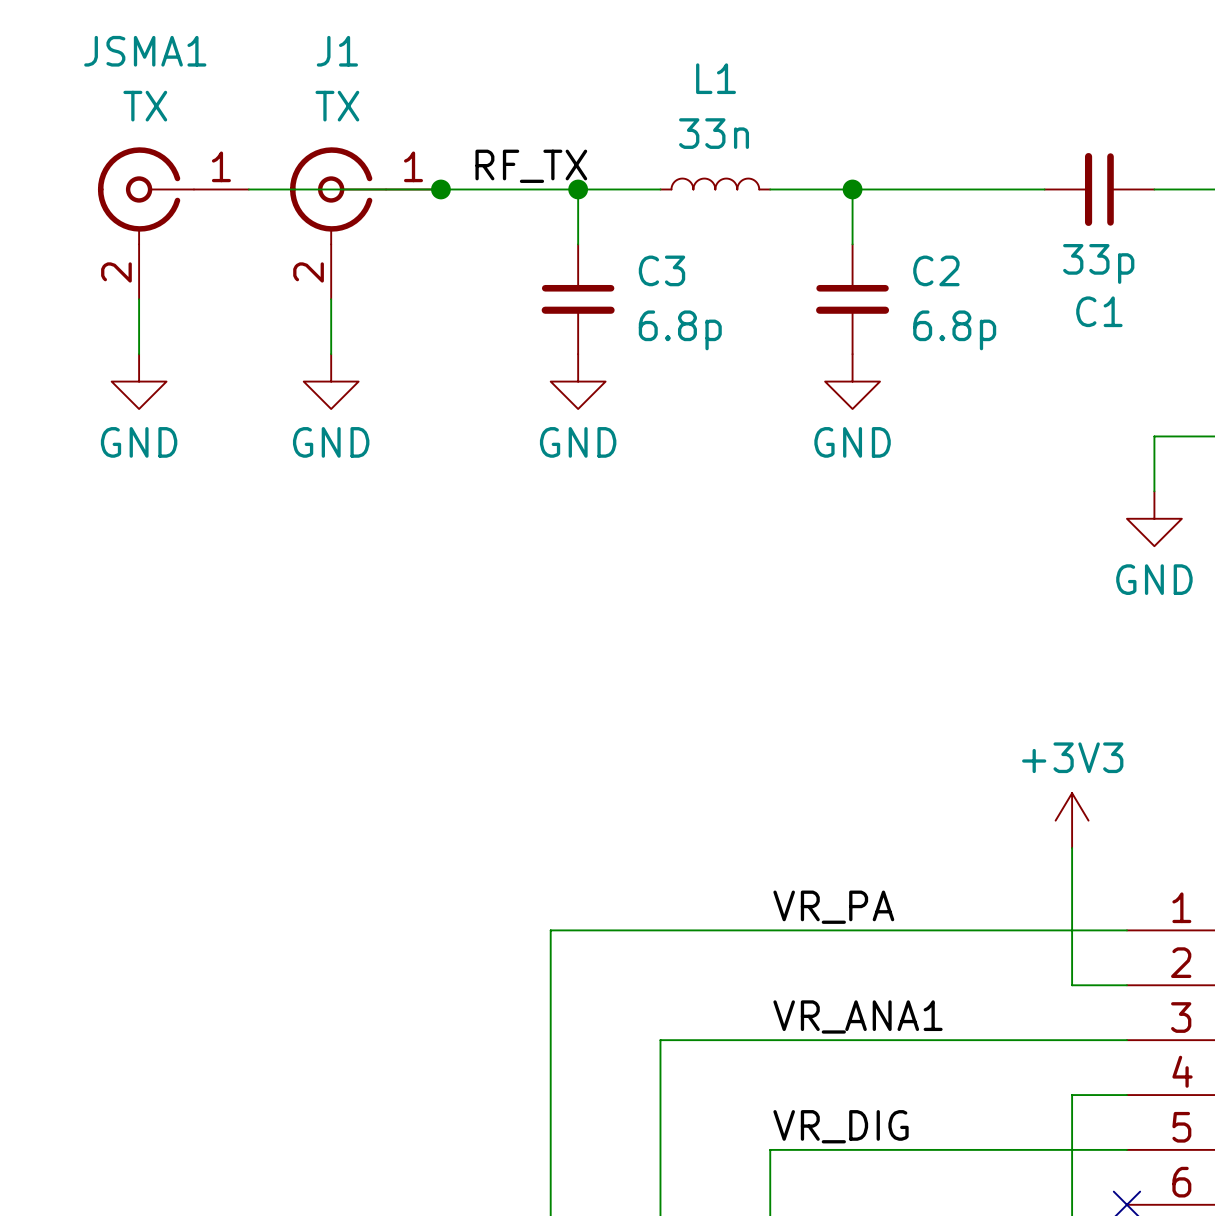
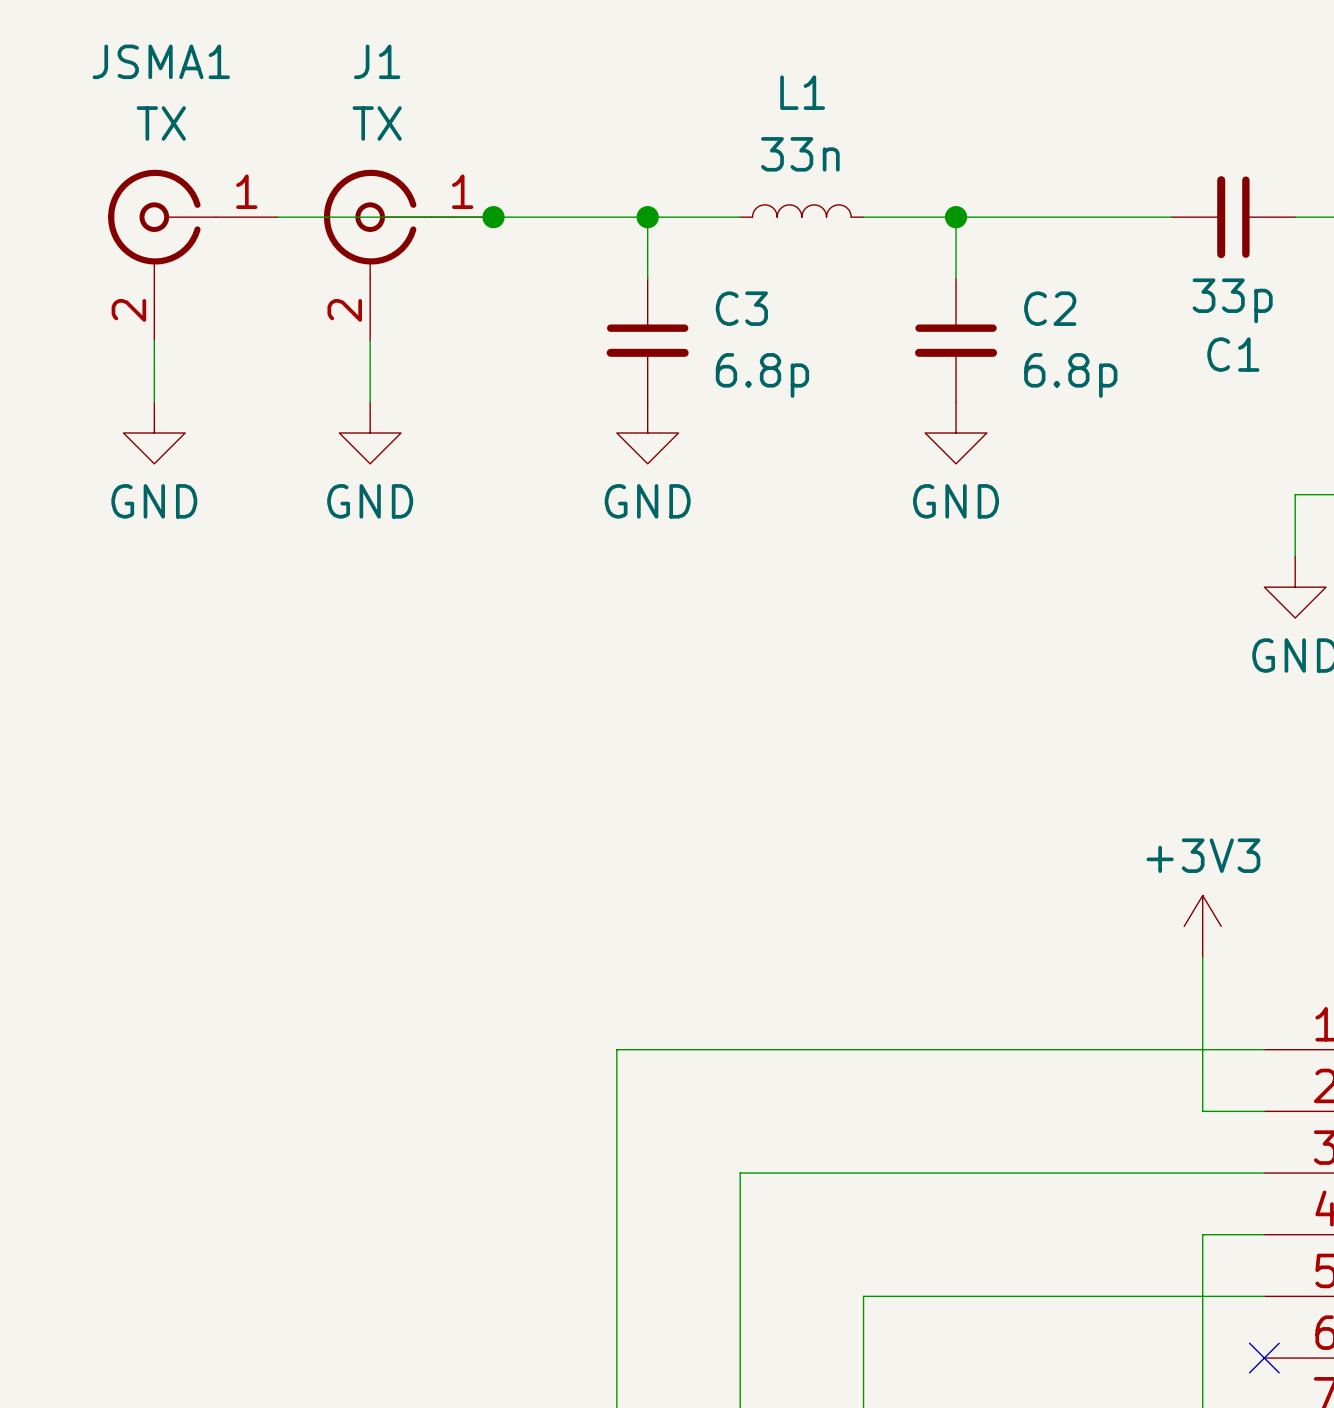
label: RF_TX (531, 166) -> none
label: VR_PA (833, 907) -> none
label: VR_ANA1 (857, 1016) -> none
label: VR_DIG (841, 1126) -> none

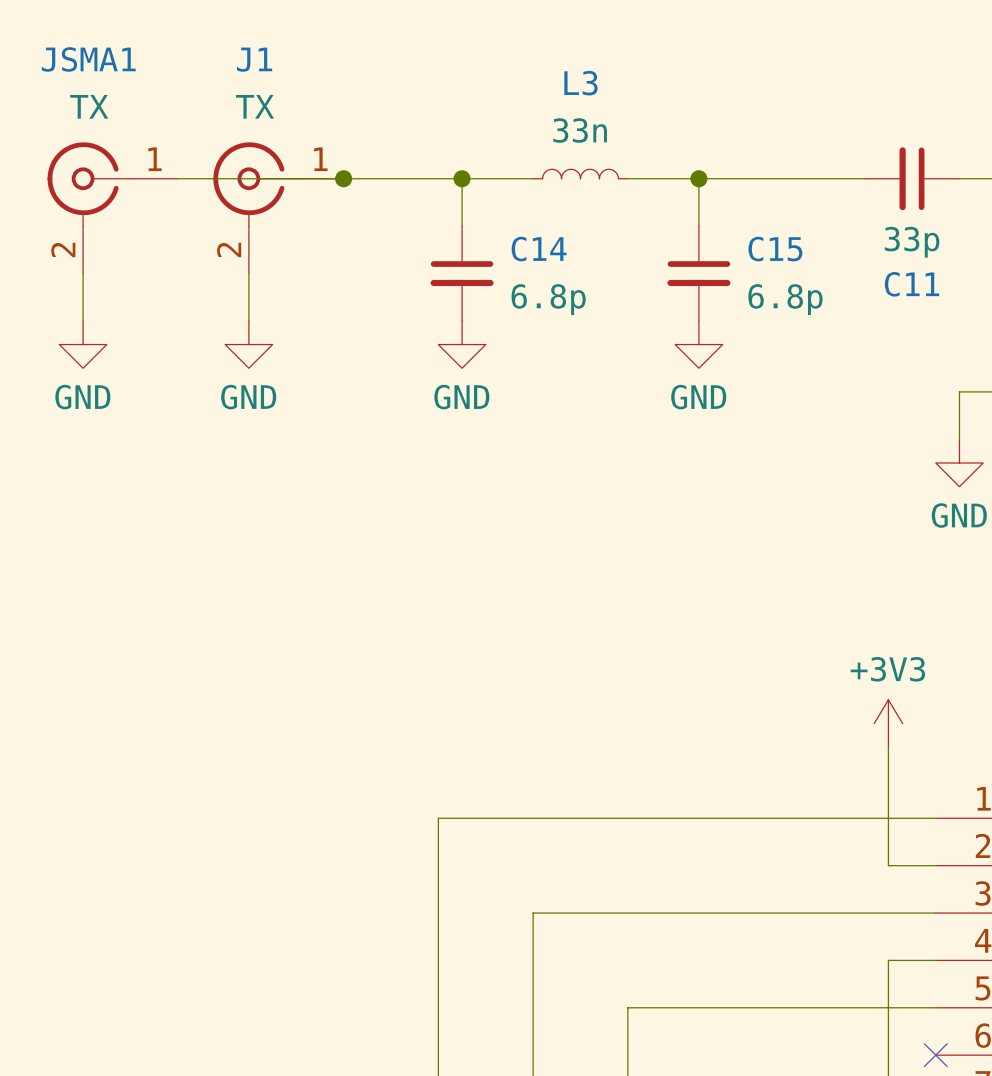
L1 name: L1 (802, 92) -> L3 (580, 83)
C3 name: C3 (741, 308) -> C14 (539, 249)
C2 name: C2 (1050, 308) -> C15 (775, 249)
C1 name: C1 (1233, 354) -> C11 (911, 284)

